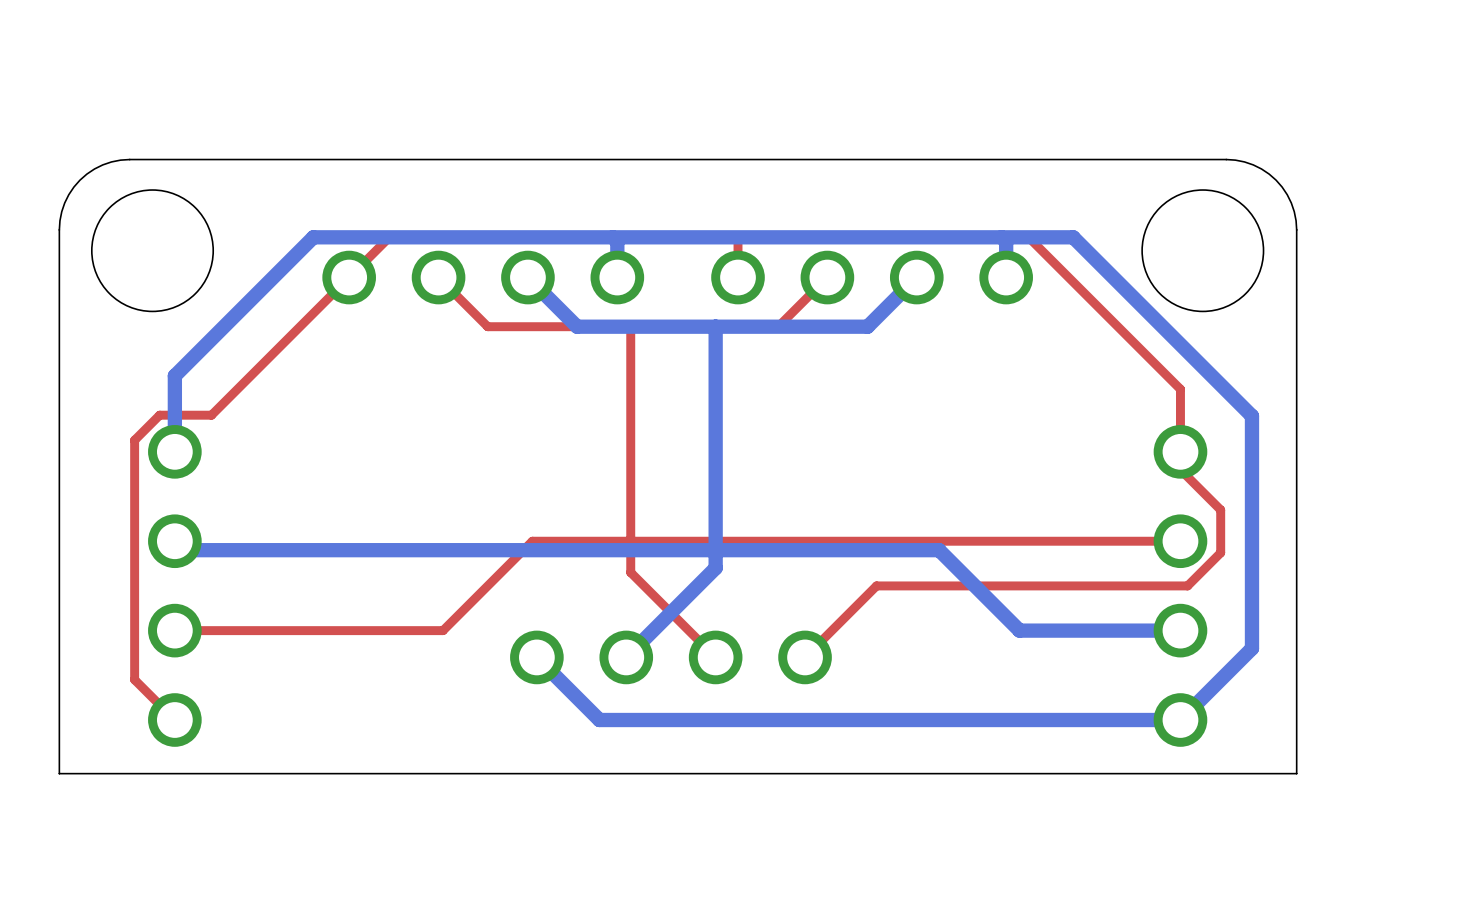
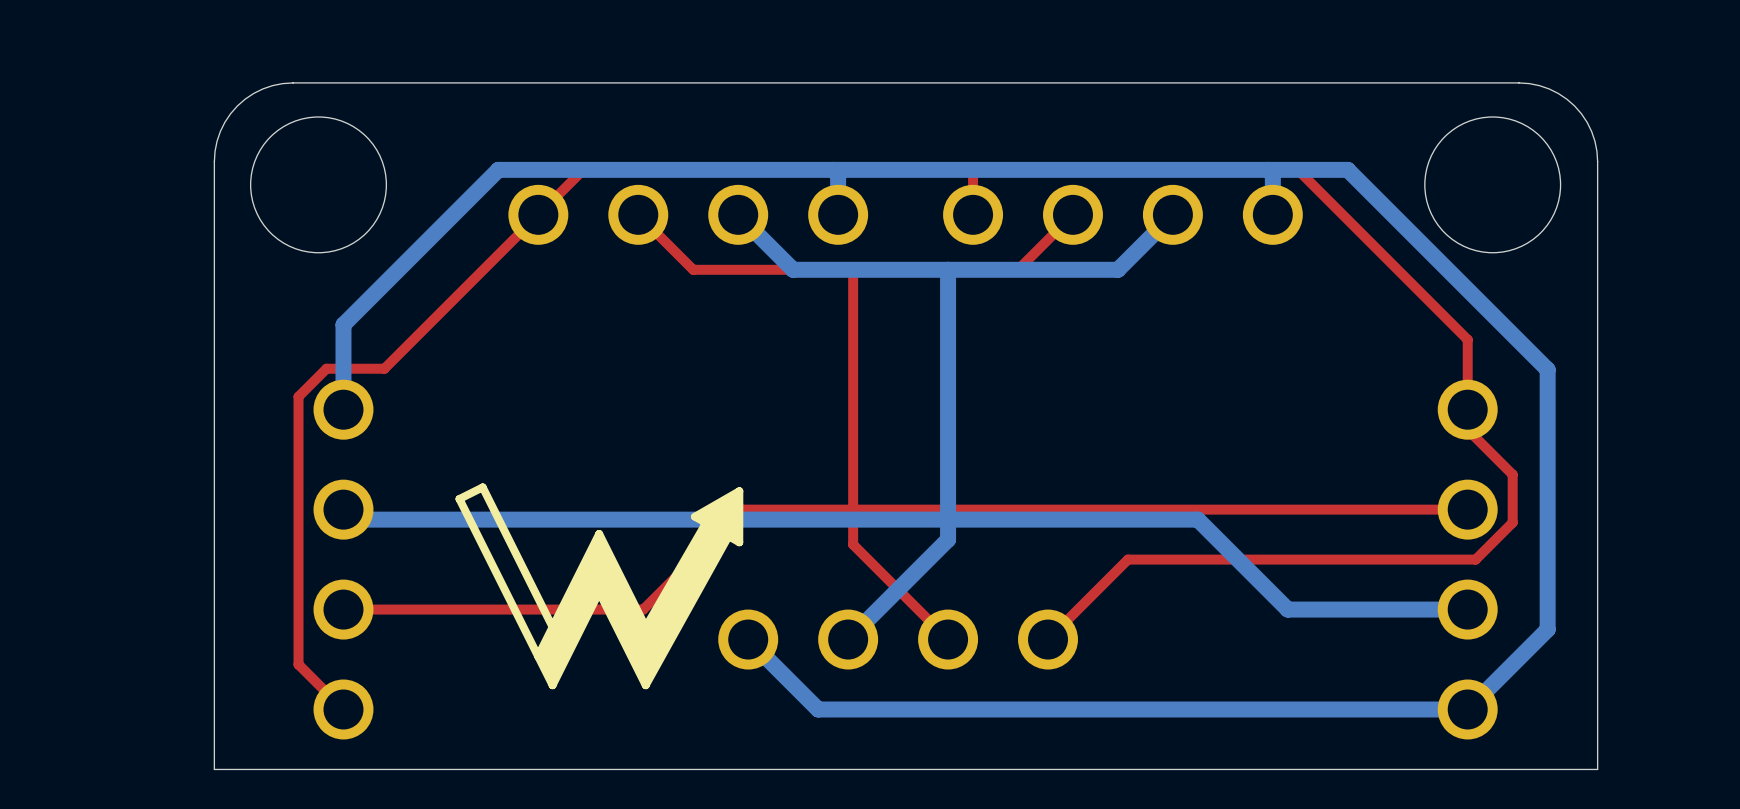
drawing: none -> [455, 483, 744, 690]

